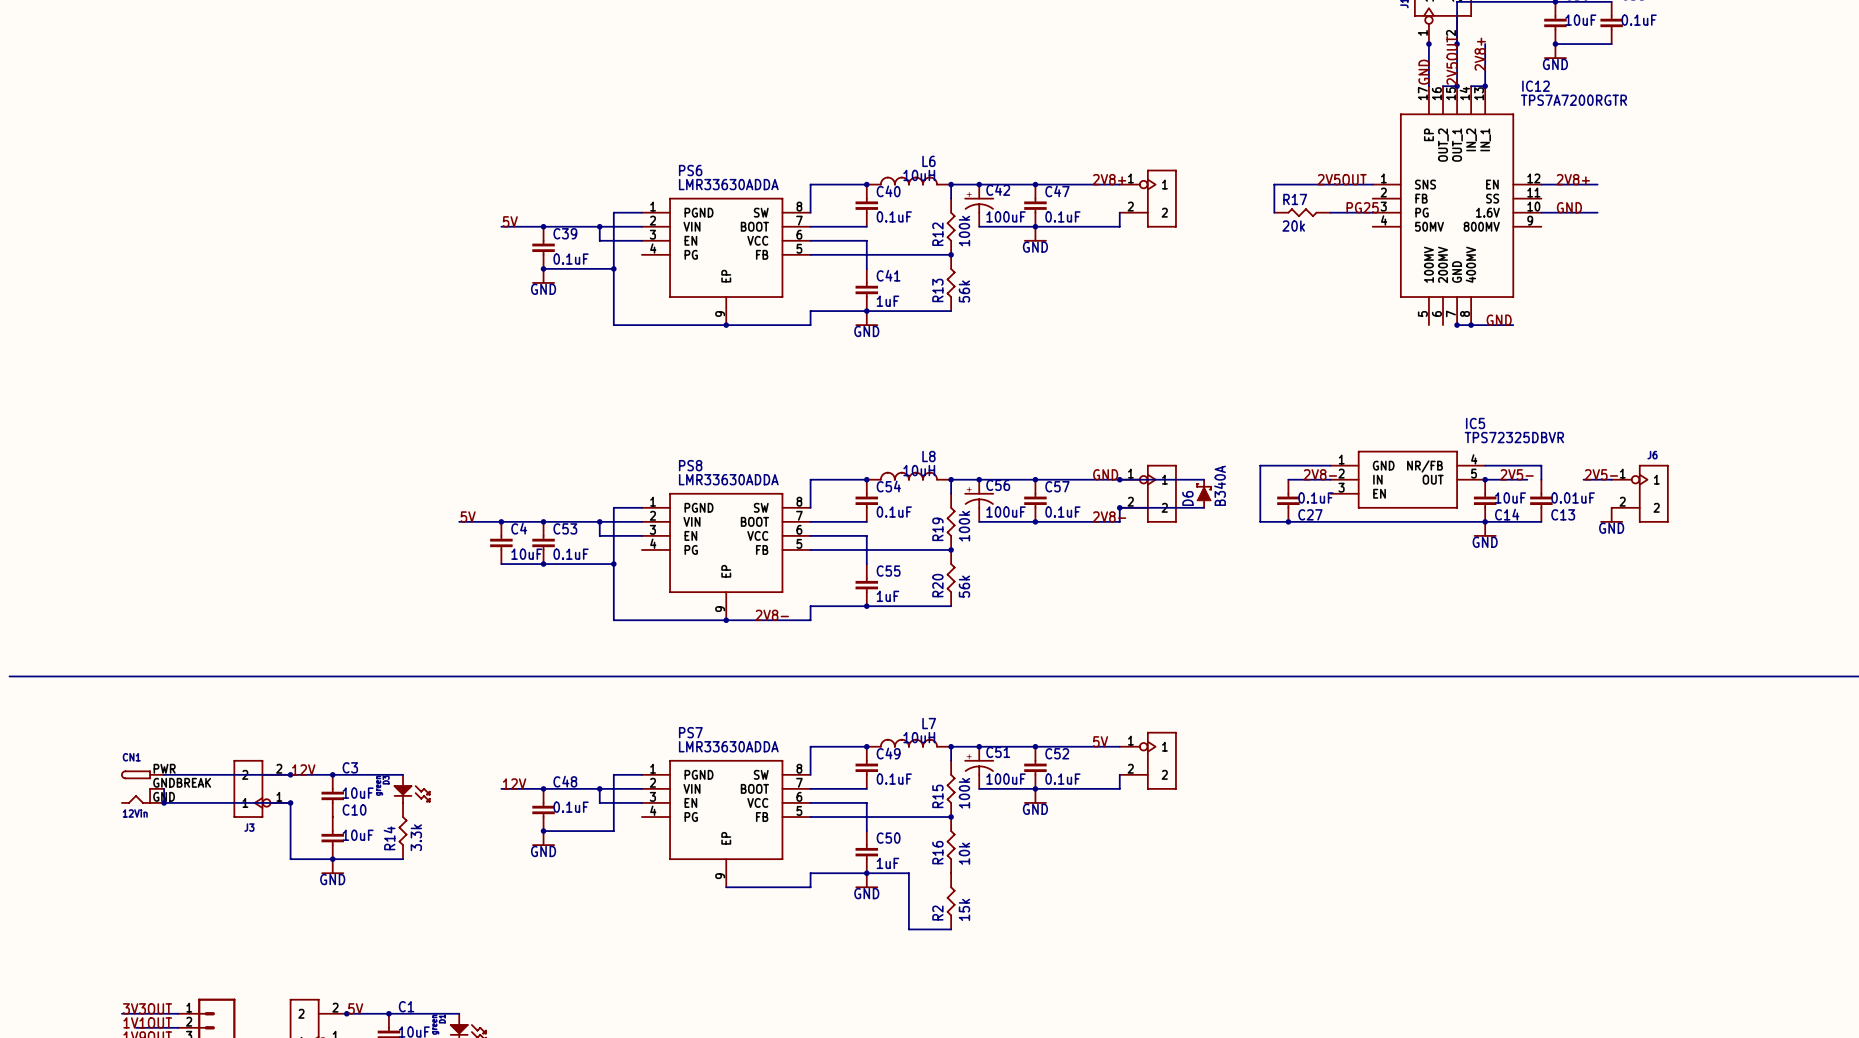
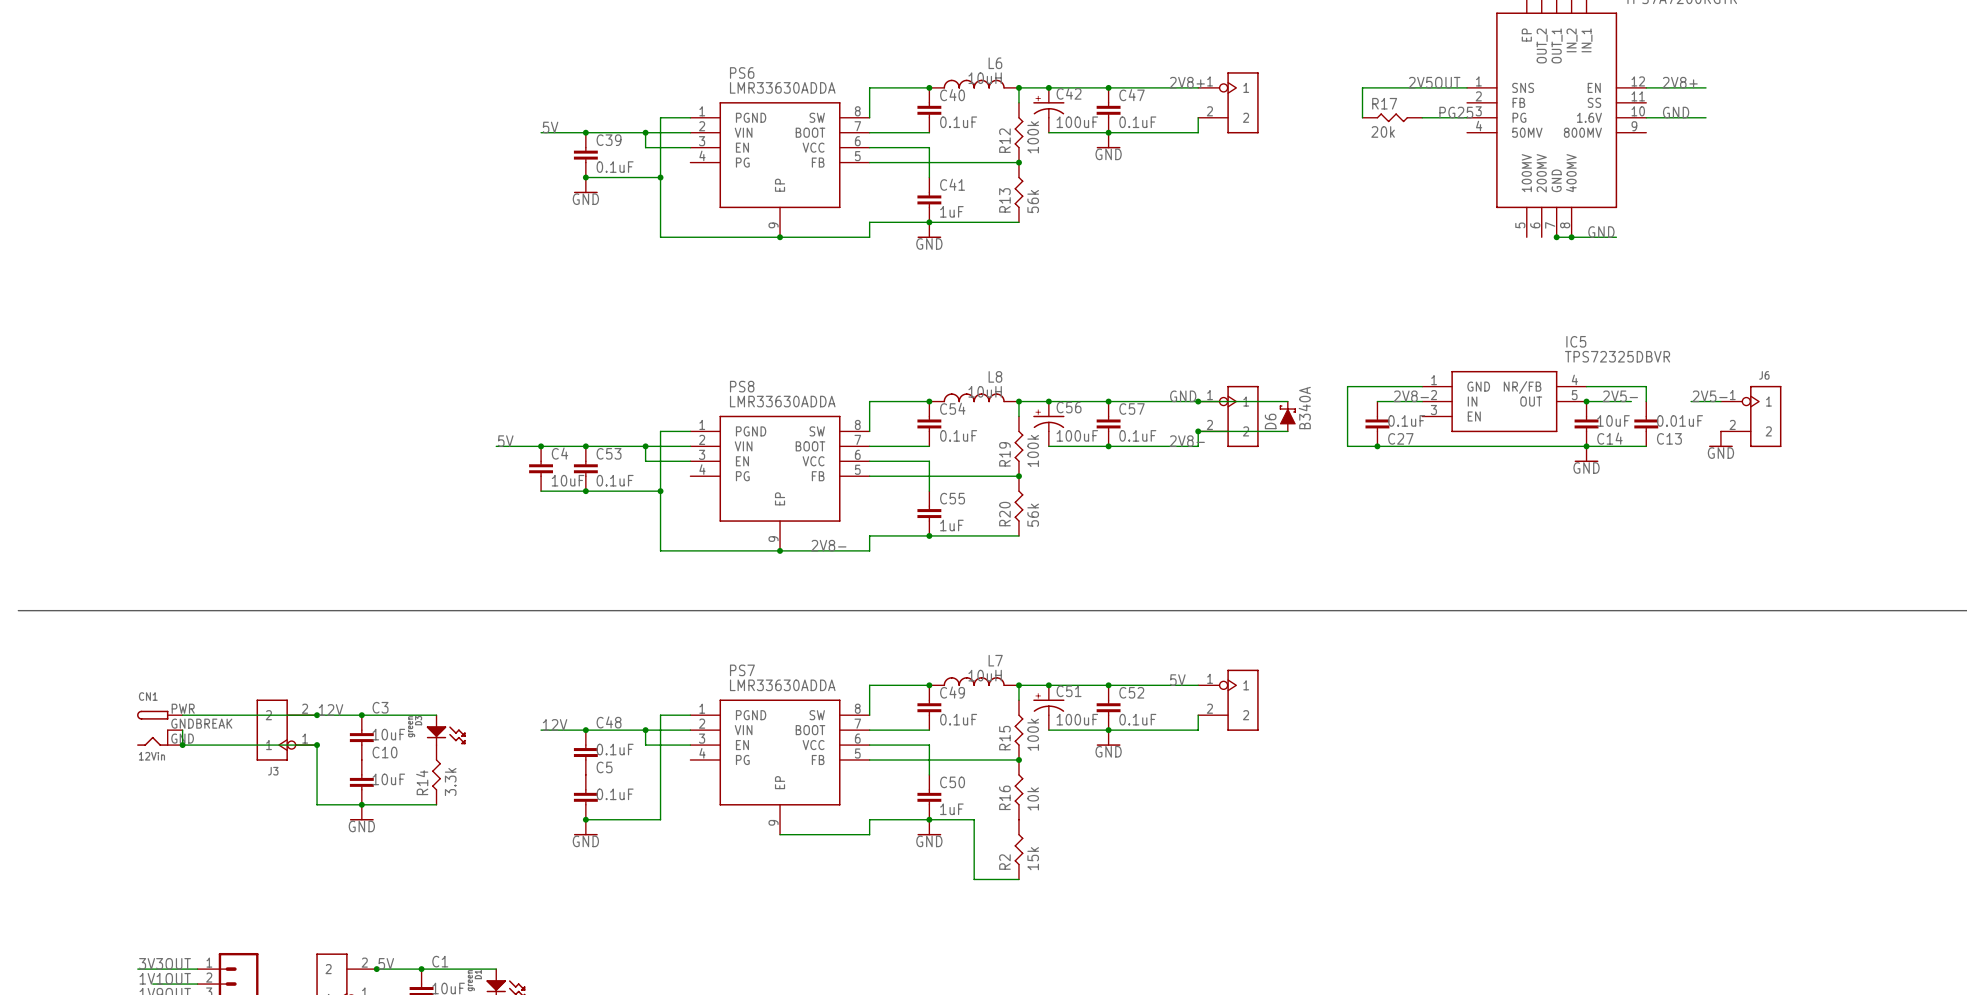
wire: (543, 831) (613, 831) -> (585, 819) (660, 819) (660, 774)
junction: (543, 831) -> none
power symbol position: GND (543, 838) -> GND (585, 827)
C5: none -> 0.1uF (585, 797)
junction: none -> (585, 819)

